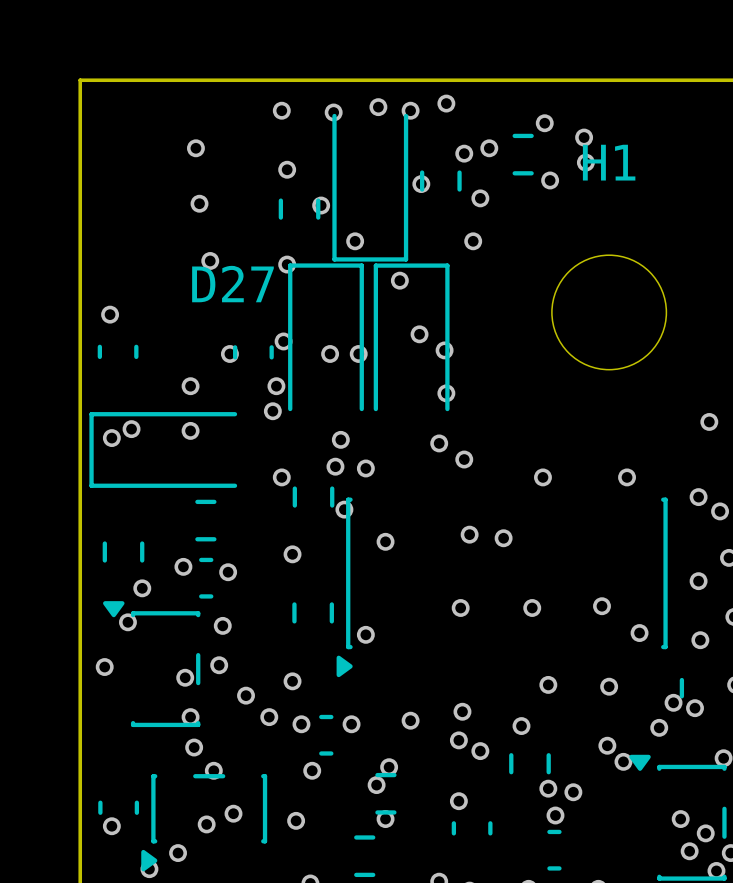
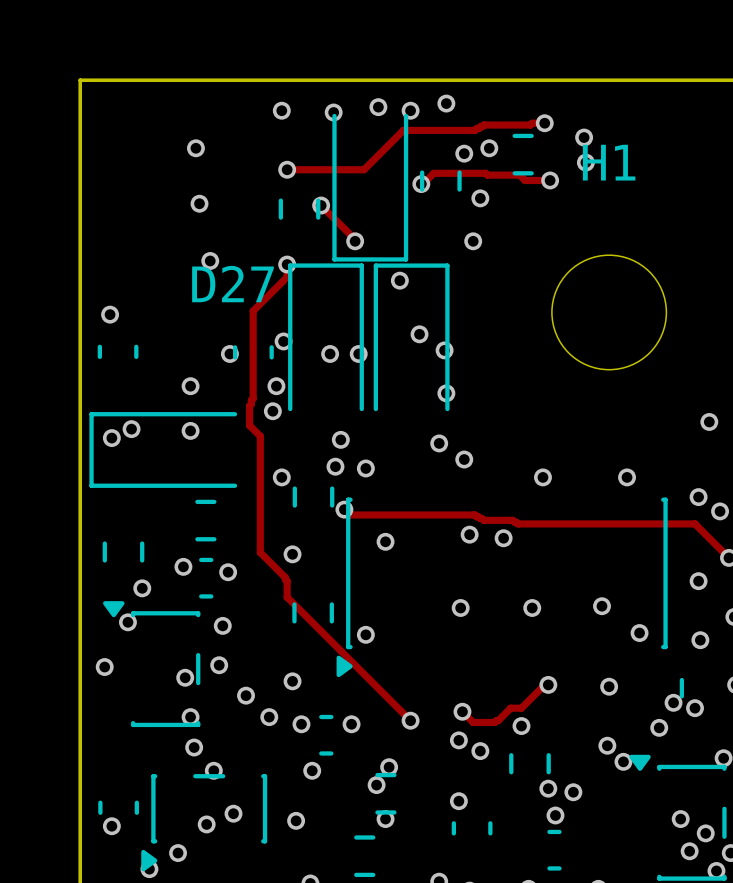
track: none -> (542, 123) (483, 125) (474, 130) (403, 130) (364, 169) (288, 169)
track: none -> (548, 180) (525, 180) (519, 175) (433, 173) (423, 184)
track: none -> (322, 207) (355, 241)
track: none -> (287, 264) (287, 277) (253, 311) (253, 398) (249, 405) (249, 425) (260, 436) (260, 552) (285, 577) (287, 597) (410, 720)
track: none -> (344, 509) (349, 514) (474, 514) (483, 520) (512, 520) (517, 523) (695, 523) (728, 557)
track: none -> (546, 684) (521, 708) (510, 708) (494, 722) (473, 722) (462, 711)

